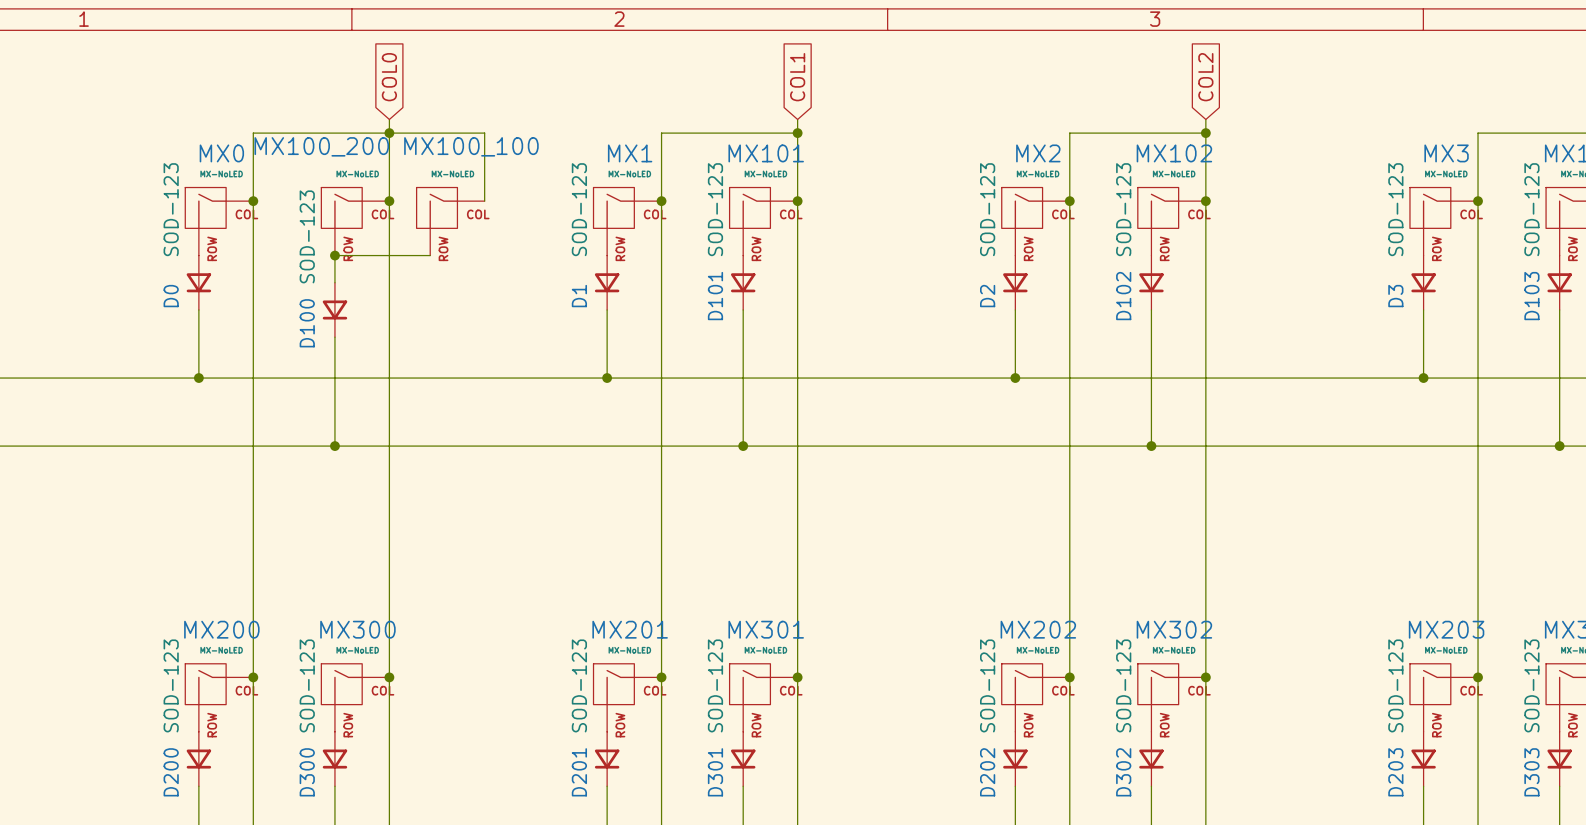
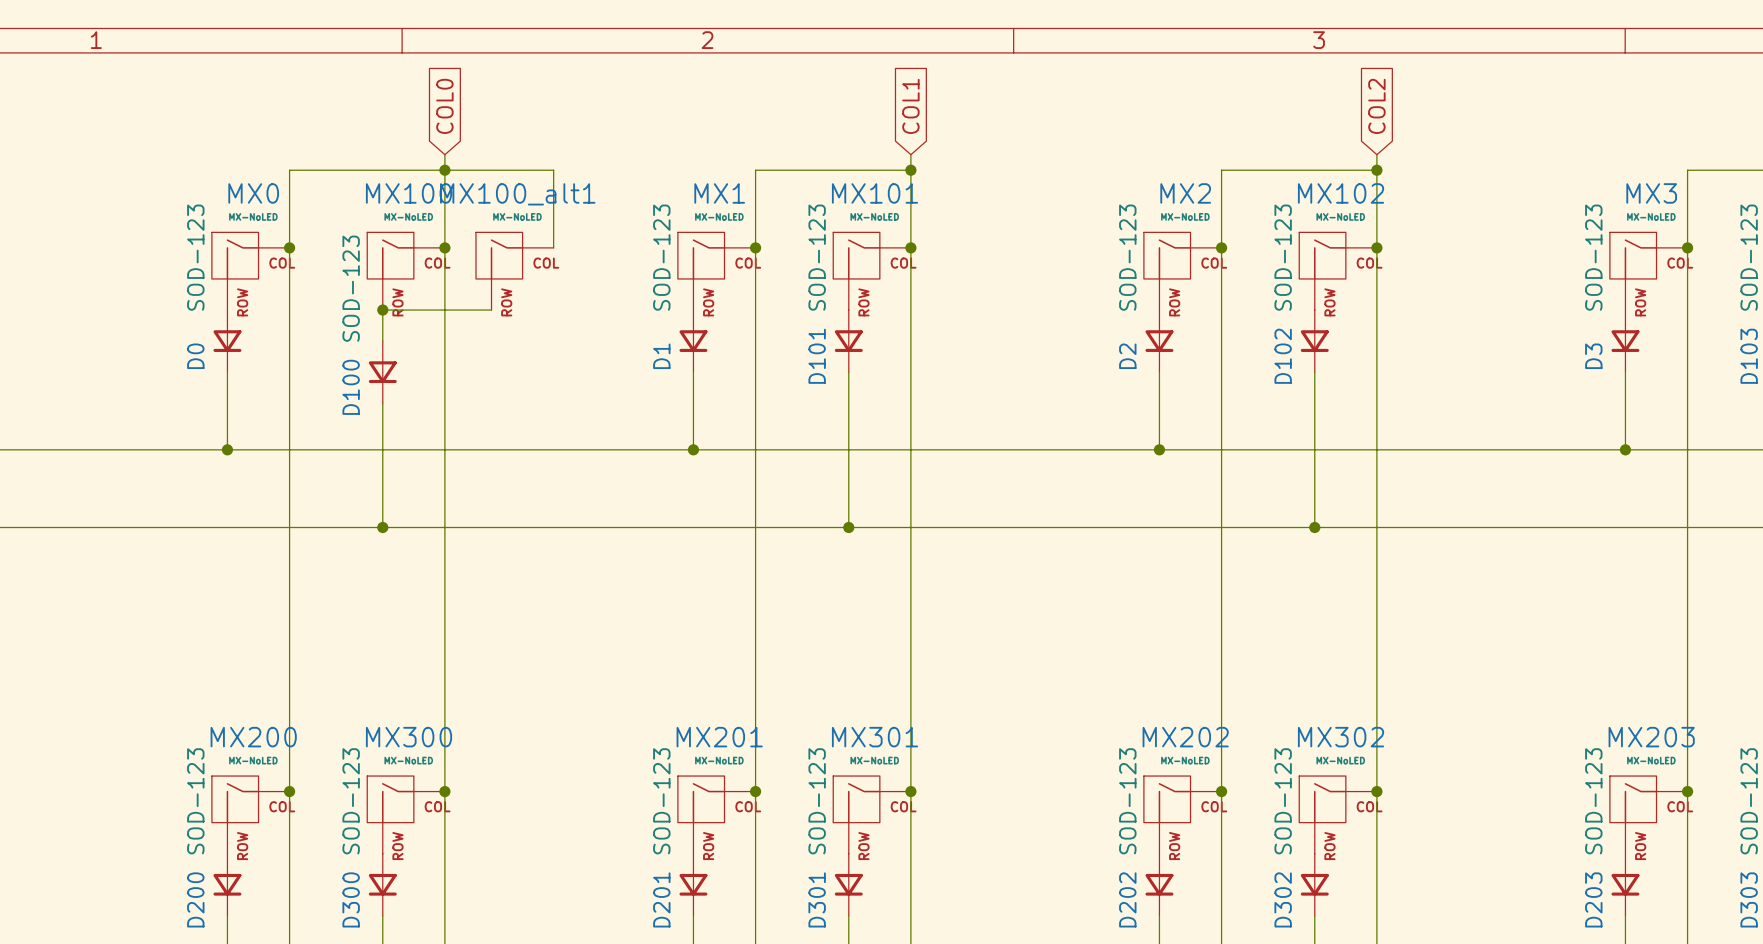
MX100_200 name: MX100_200 (321, 146) -> MX100 (409, 193)
MX100_100 name: MX100_100 (471, 146) -> MX100_alt1 (517, 194)

